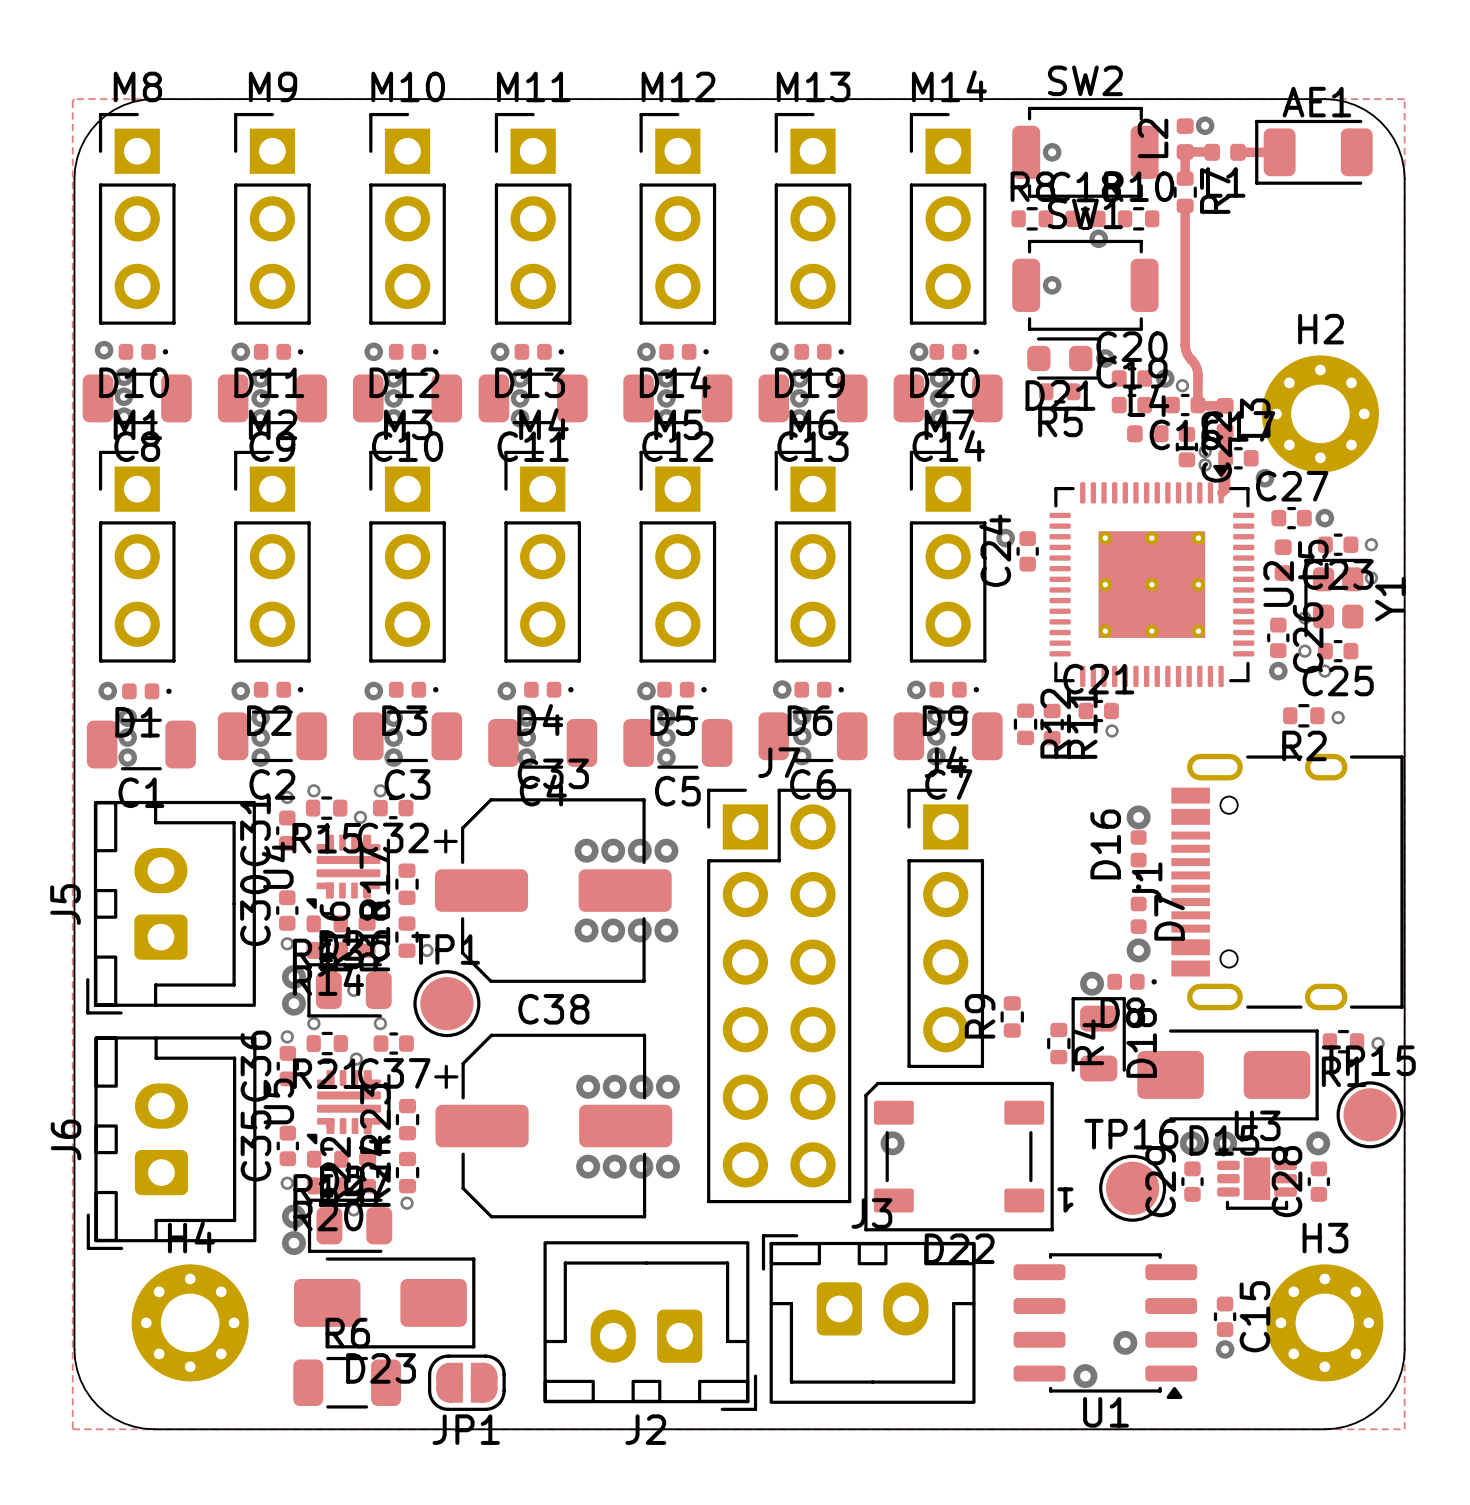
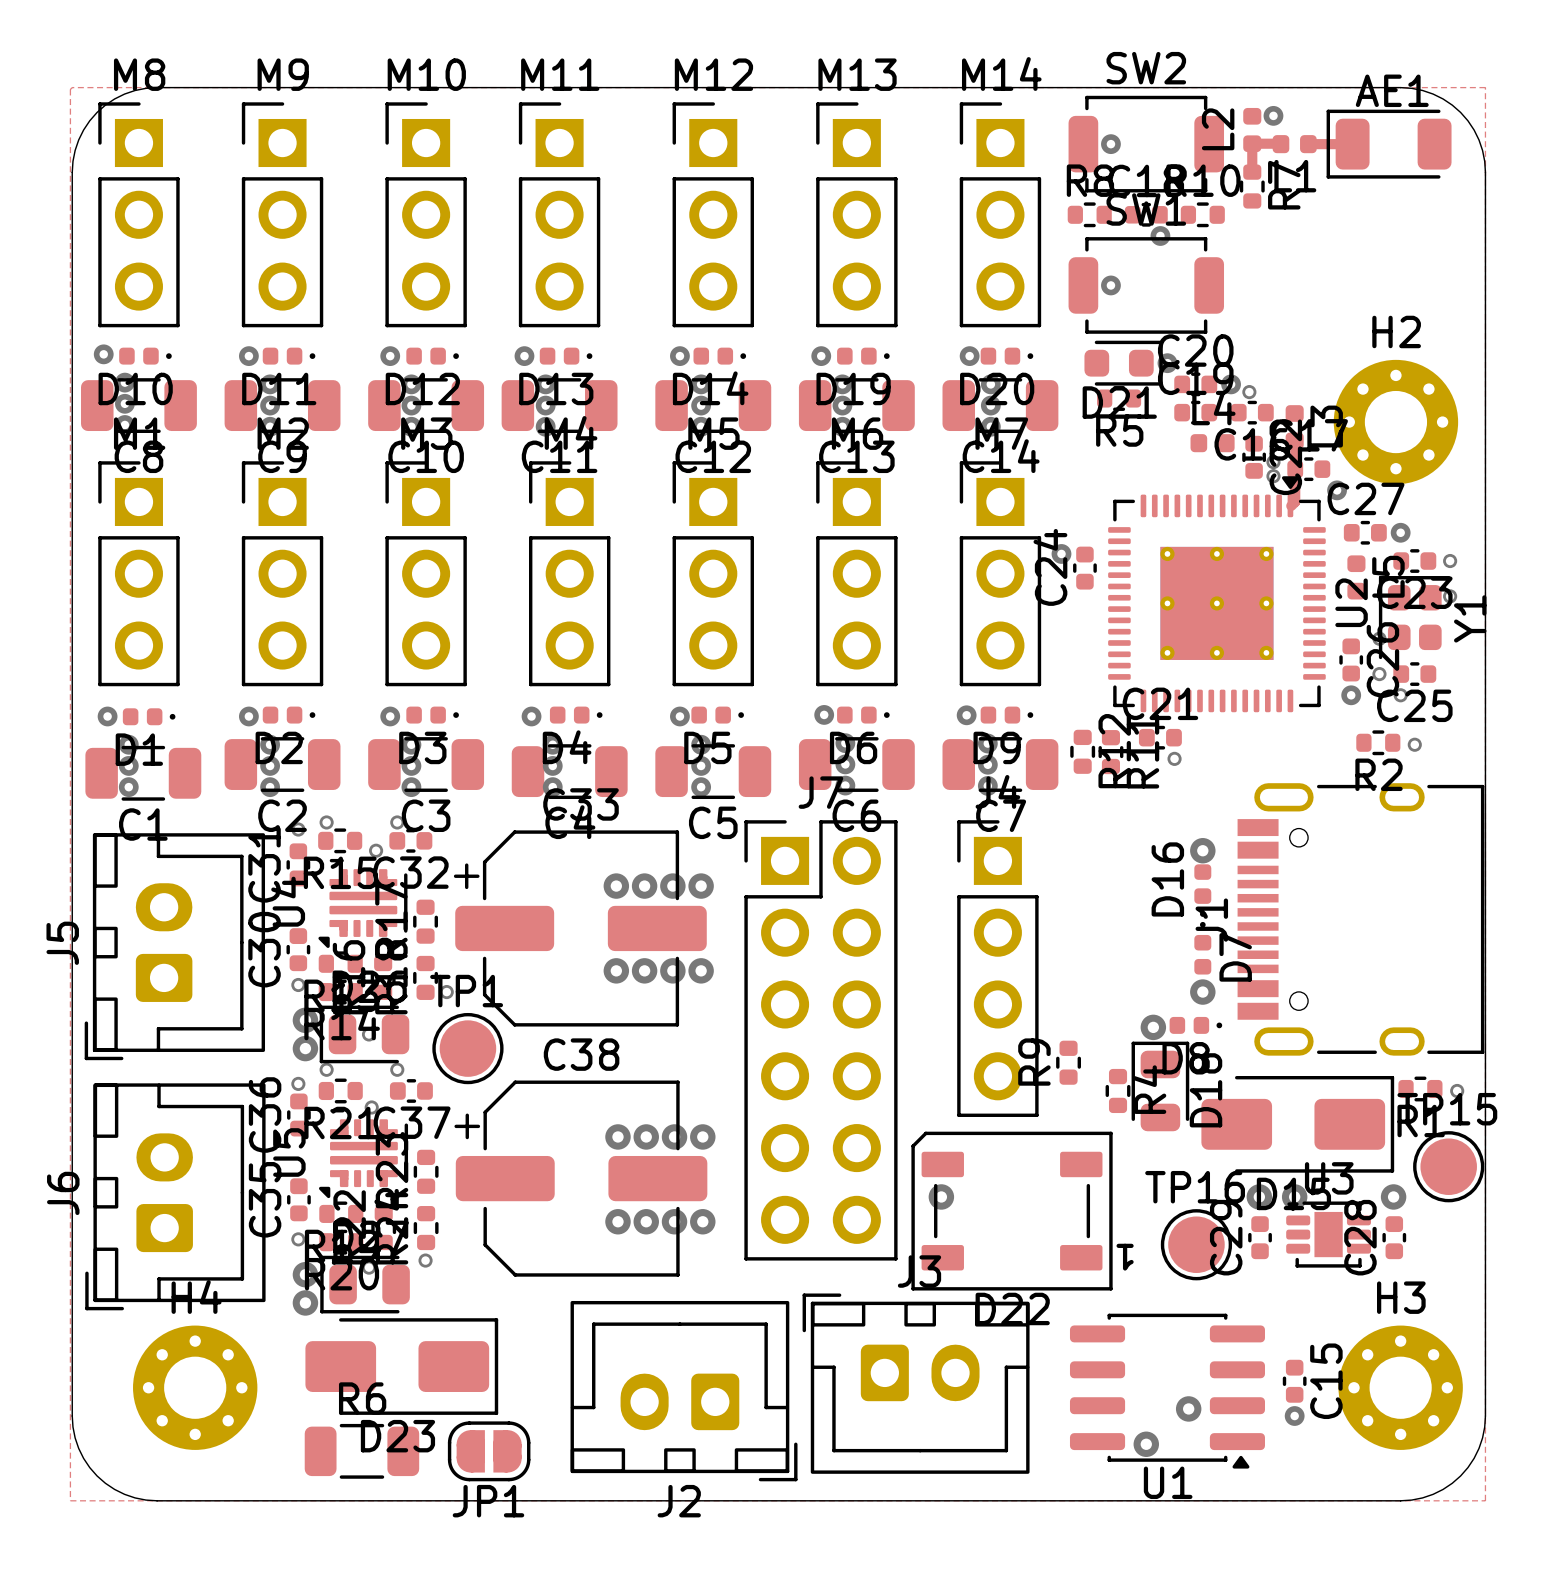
top track: (1185, 205) (1185, 344) (1186, 352) (1191, 359) -> none
top track: (1191, 360) (1197, 372) (1197, 405) (1225, 405) -> none

